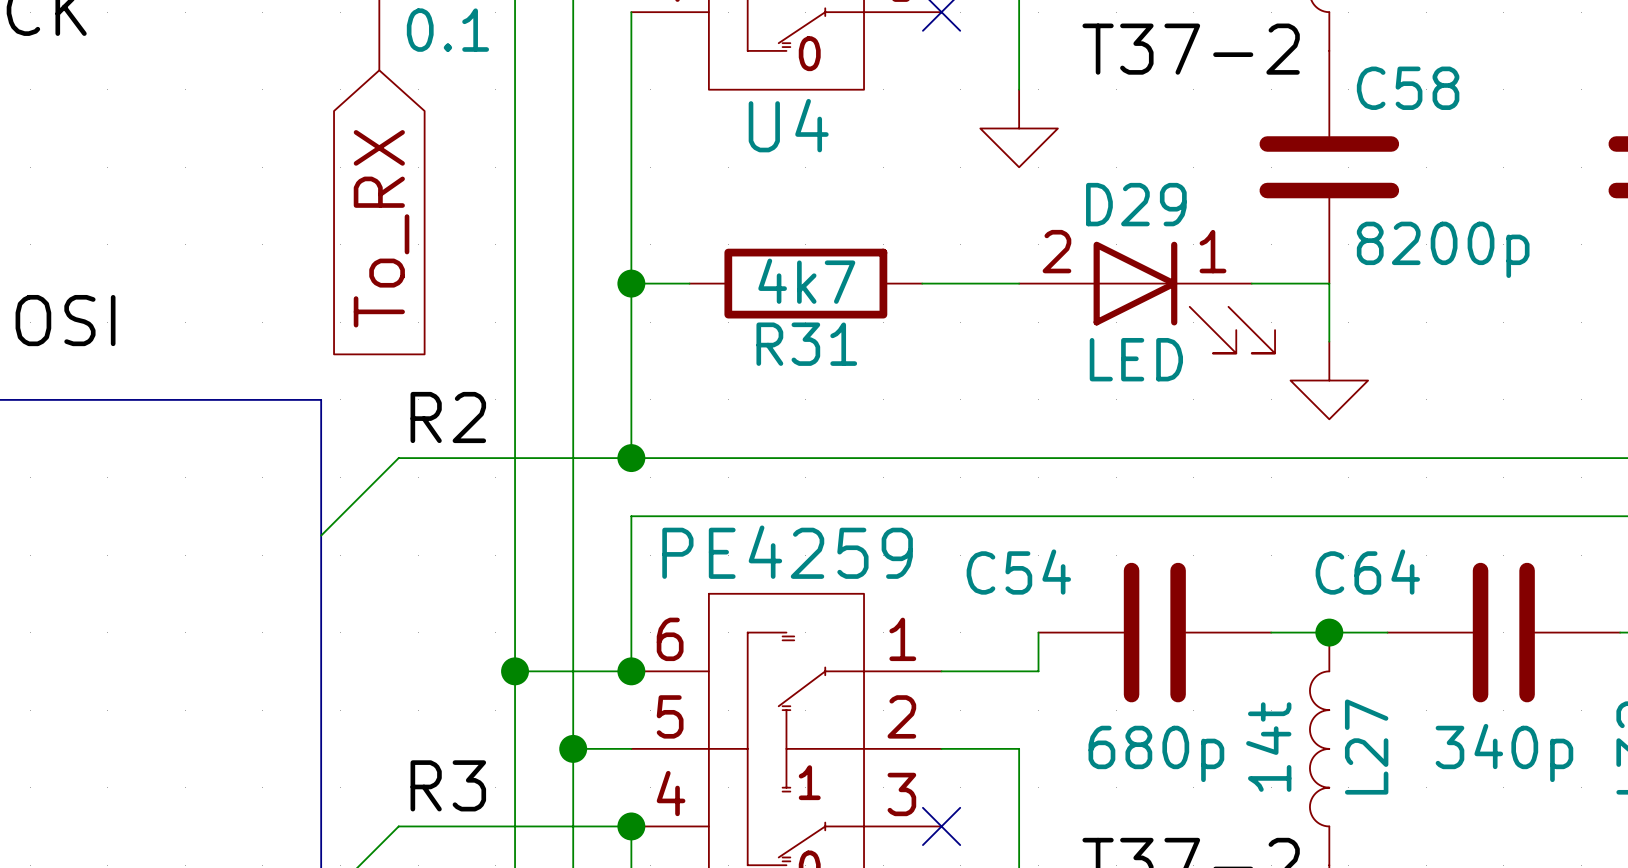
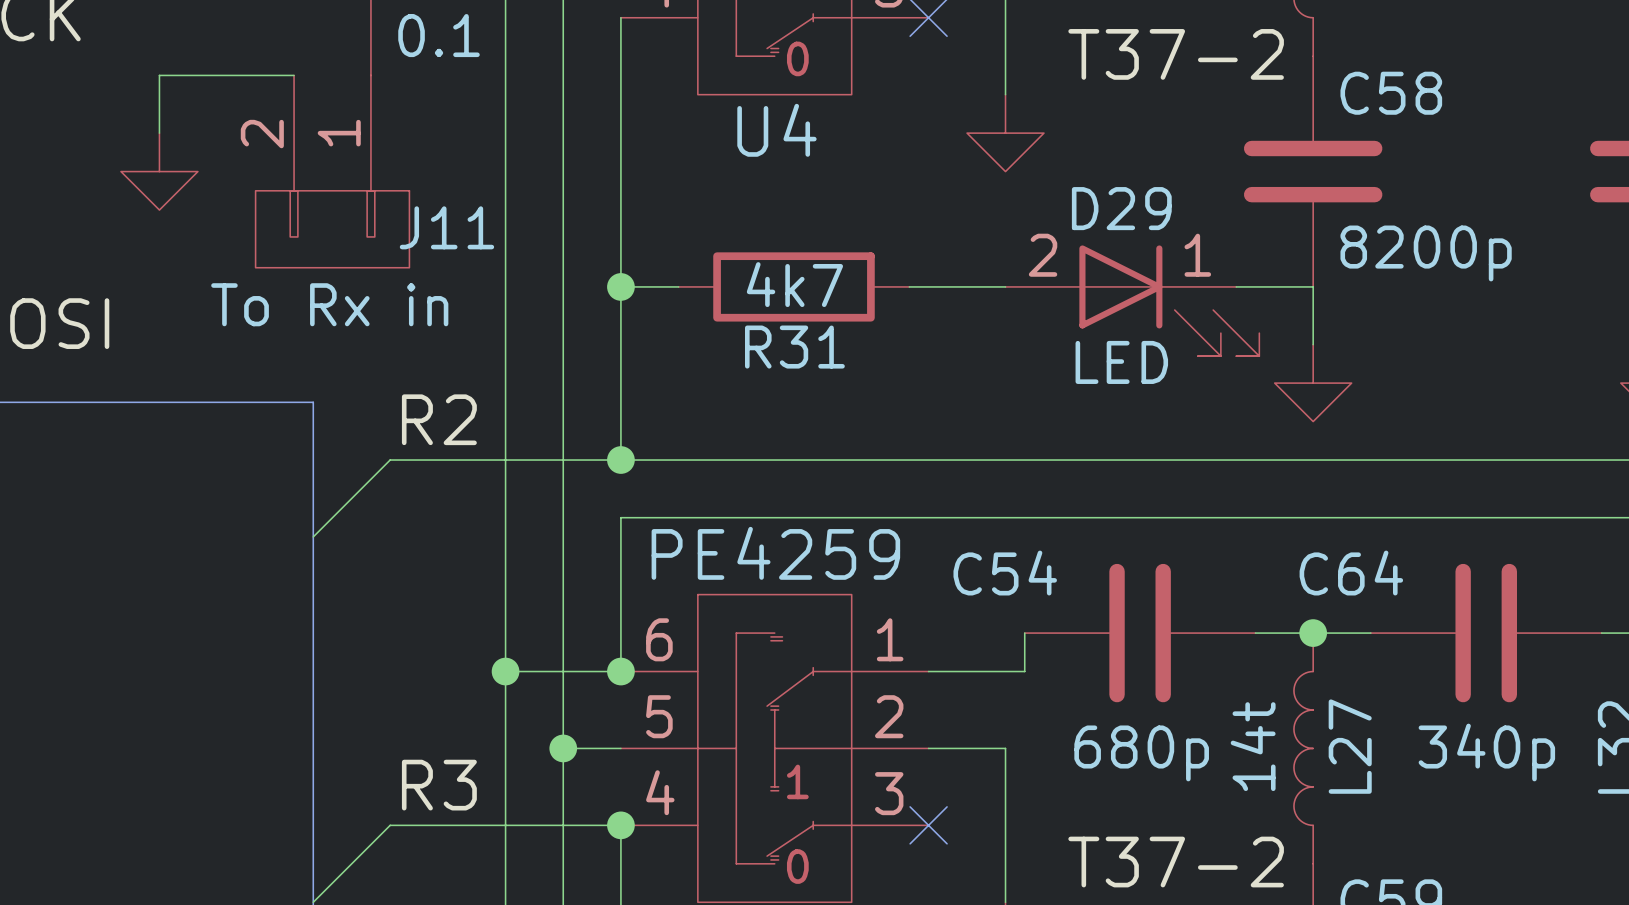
wire: none -> (294, 75) (159, 75) (159, 133)
power symbol: none -> (159, 171)
J11: none -> To Rx in (332, 171)
global label: To_RX (381, 228) -> none

